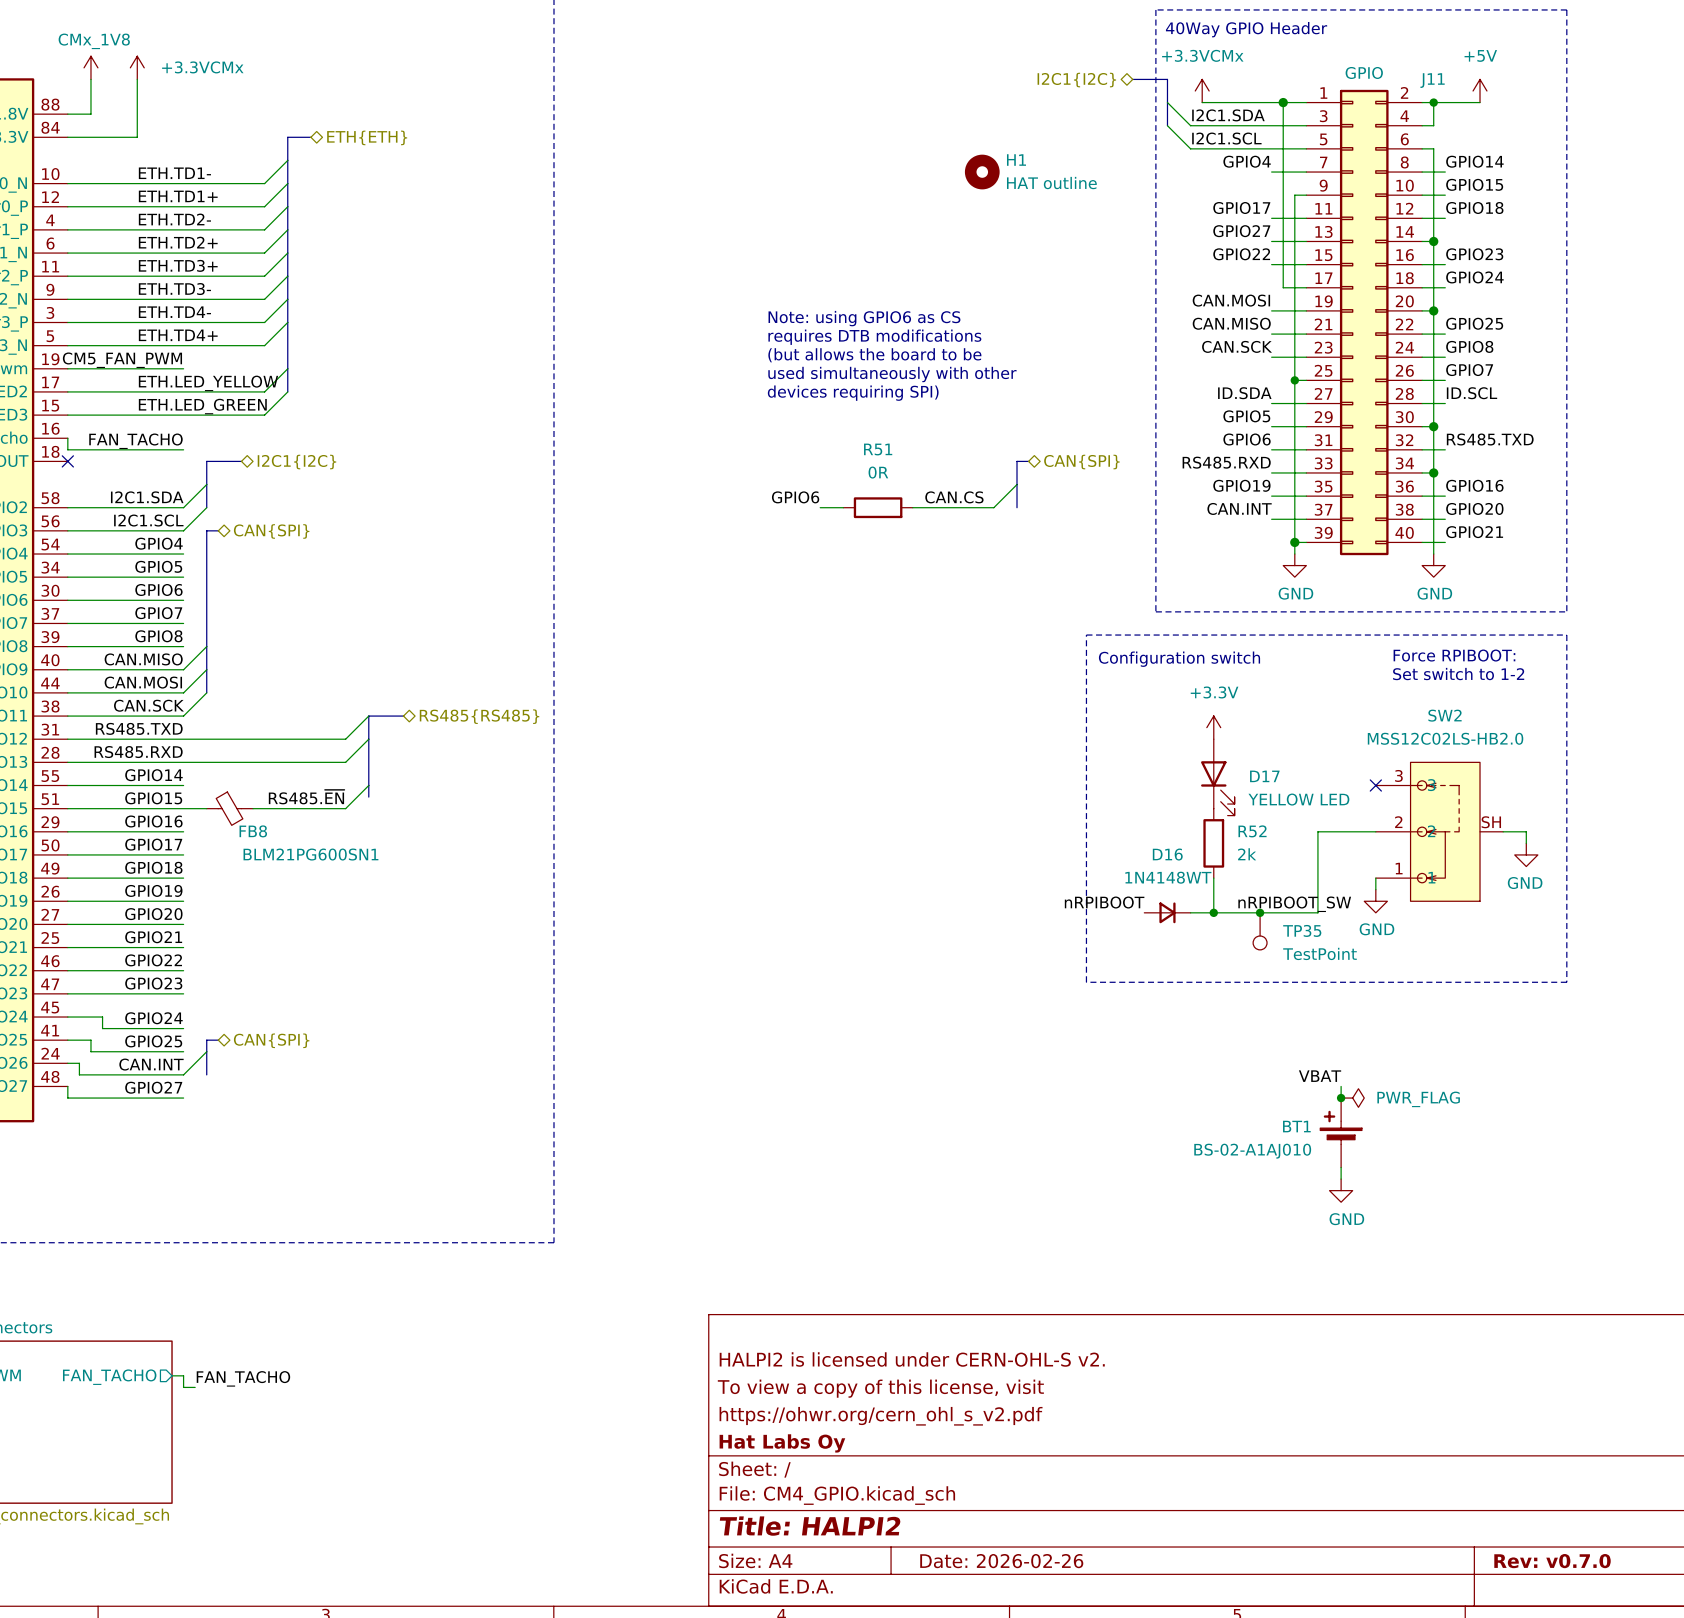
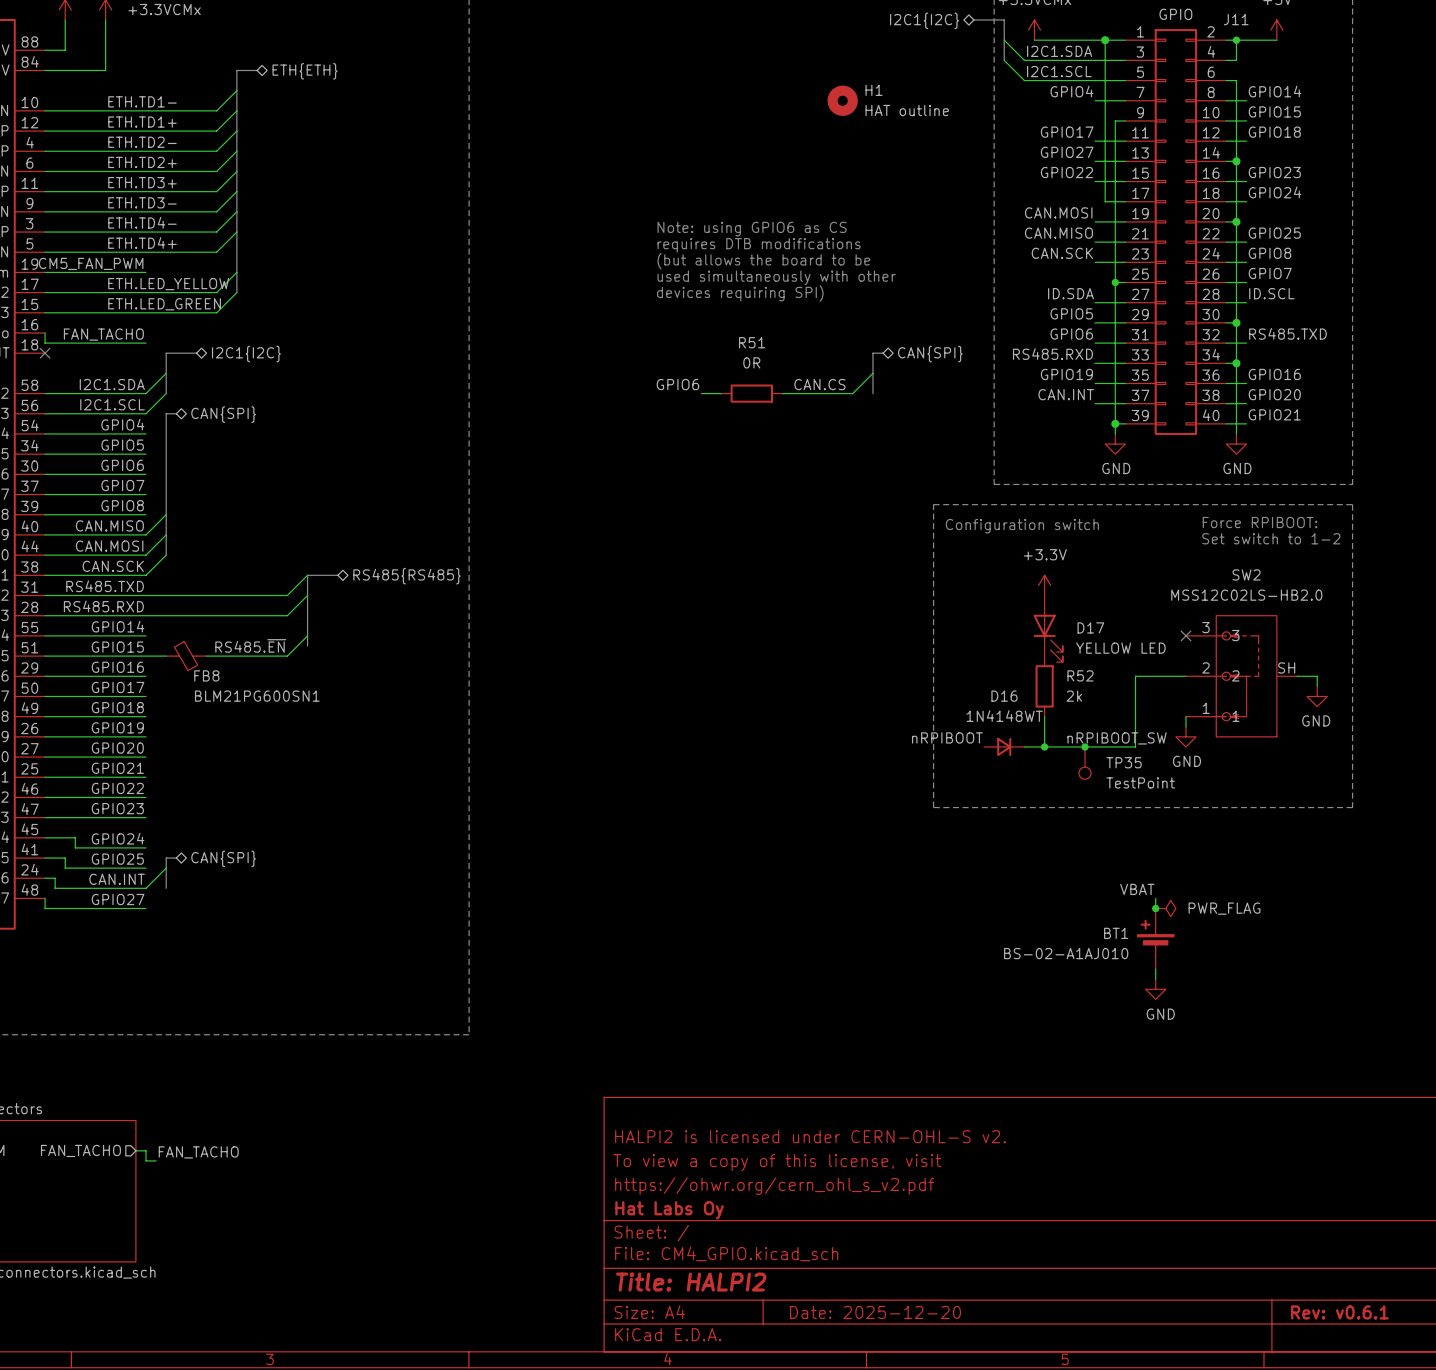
title block: Date: 2026-02-26 (1001, 1561) -> Date: 2025-12-20 (875, 1312)
title block: Rev: v0.7.0 (1552, 1561) -> Rev: v0.6.1 (1339, 1312)

